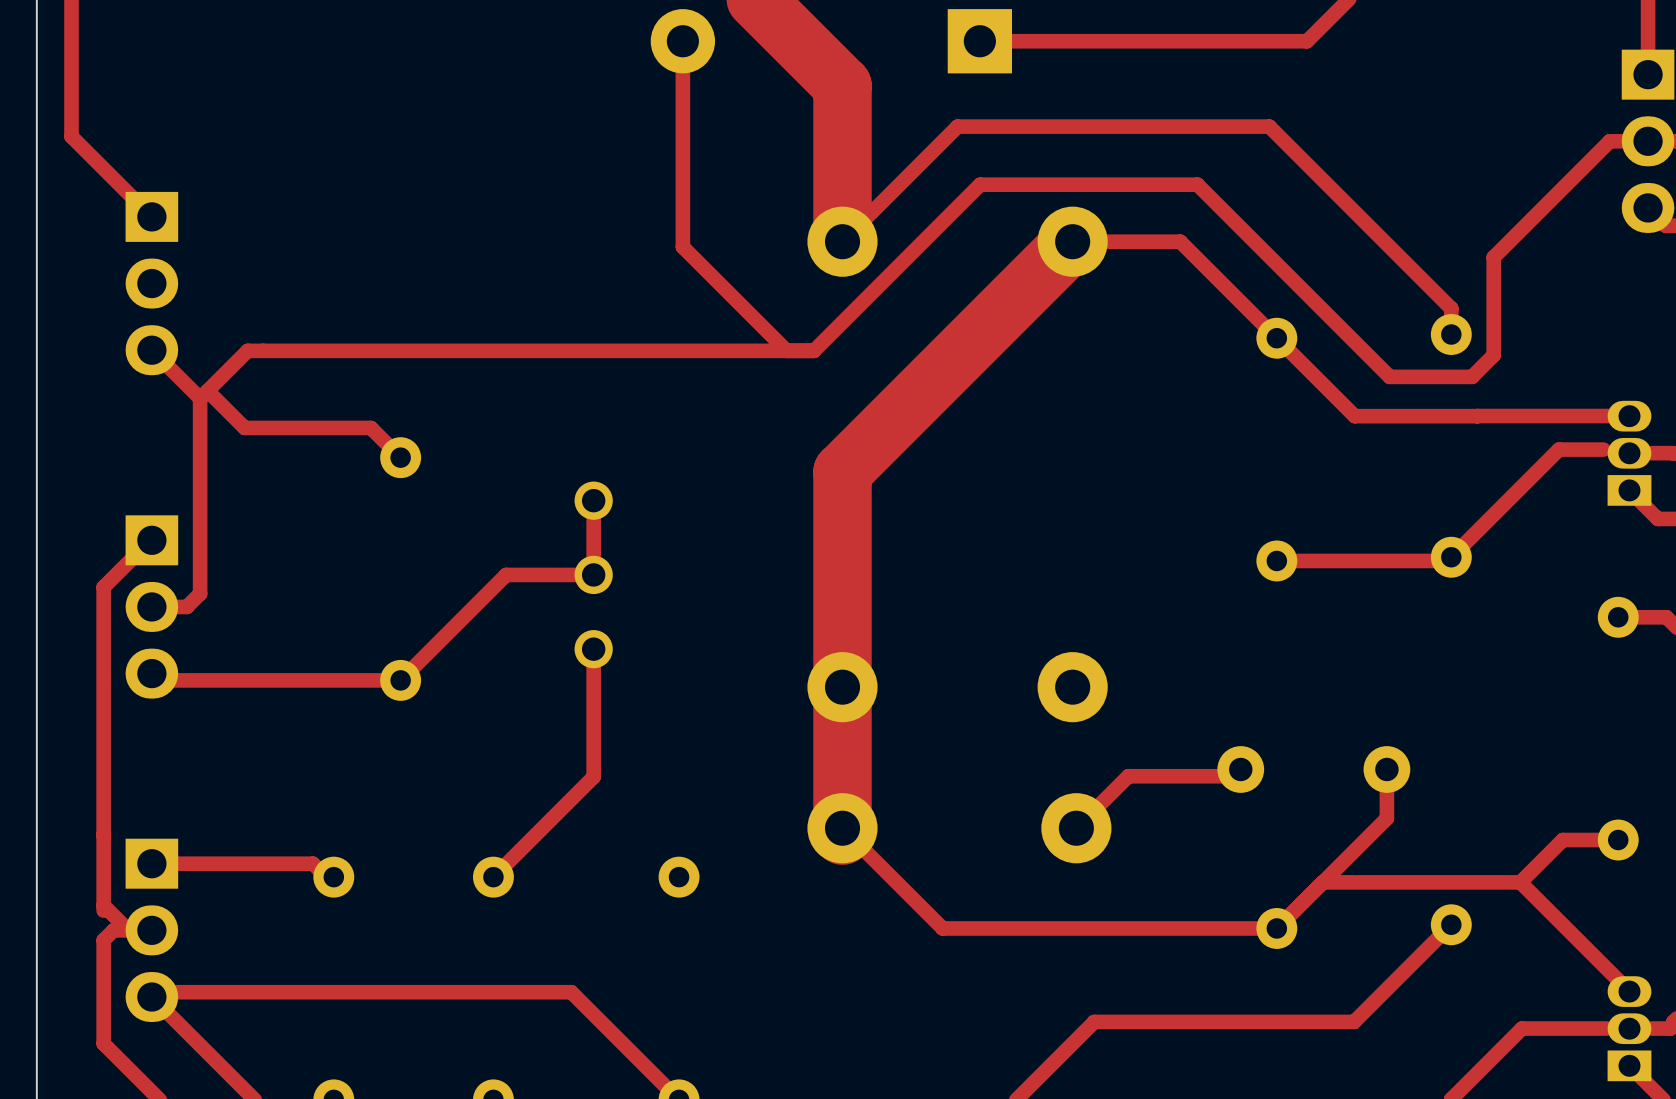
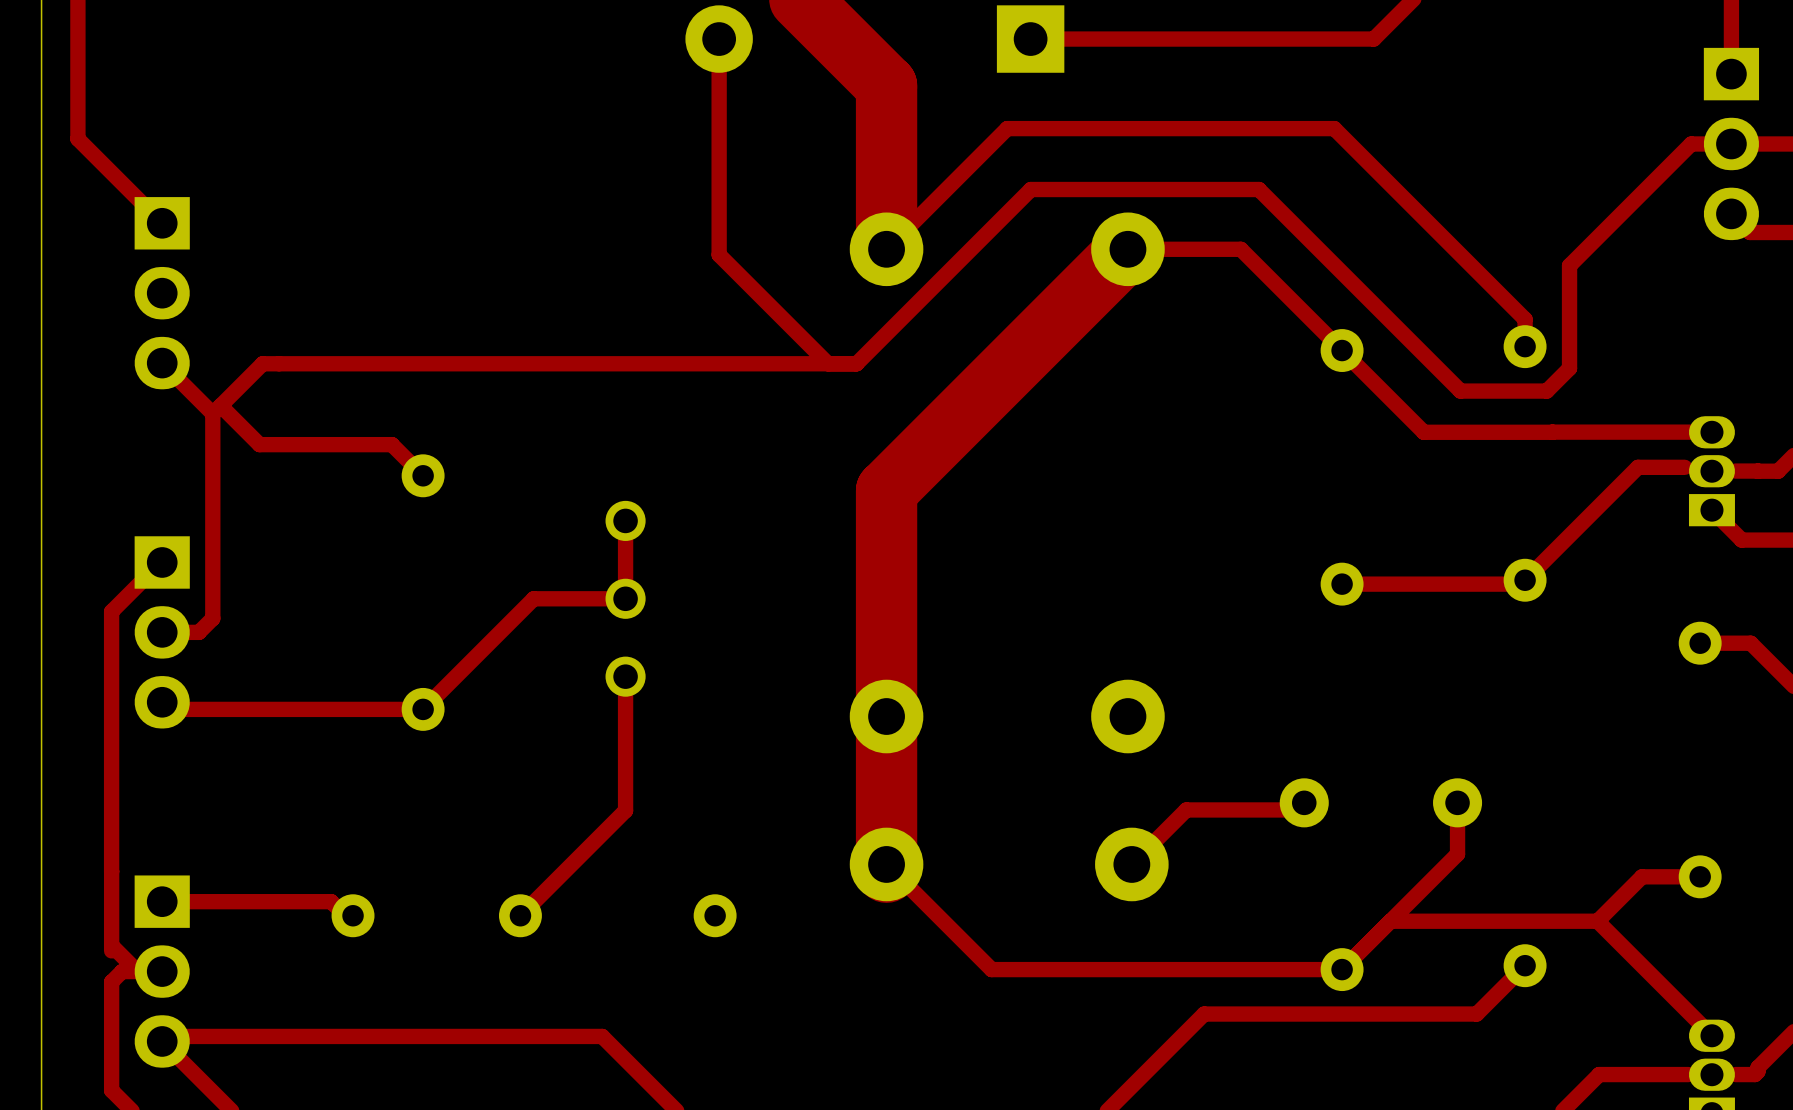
top track: (1405, 970) (1354, 1021) (1094, 1021) -> (1476, 1014) (1204, 1014) (1150, 1067)

